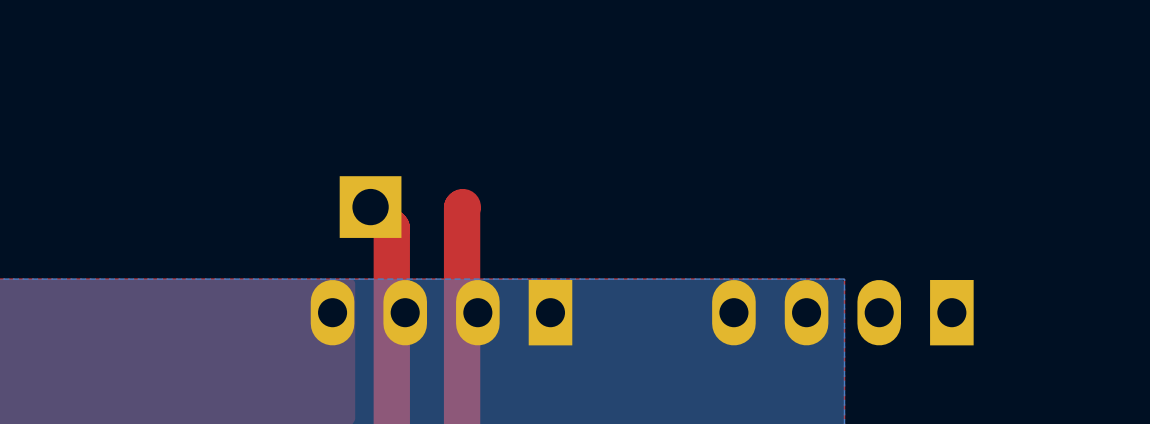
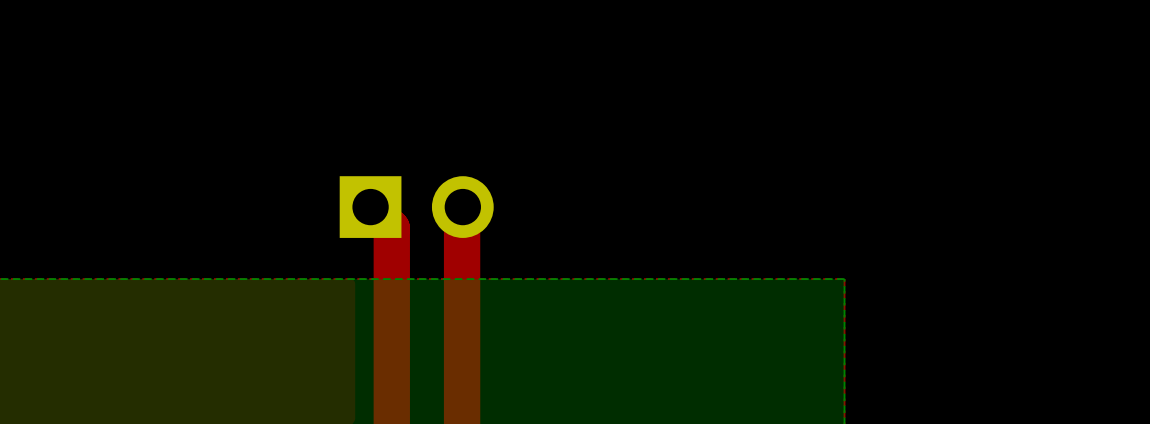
part: none -> (416, 207)
part: (441, 312) -> none
part: (842, 312) -> none

